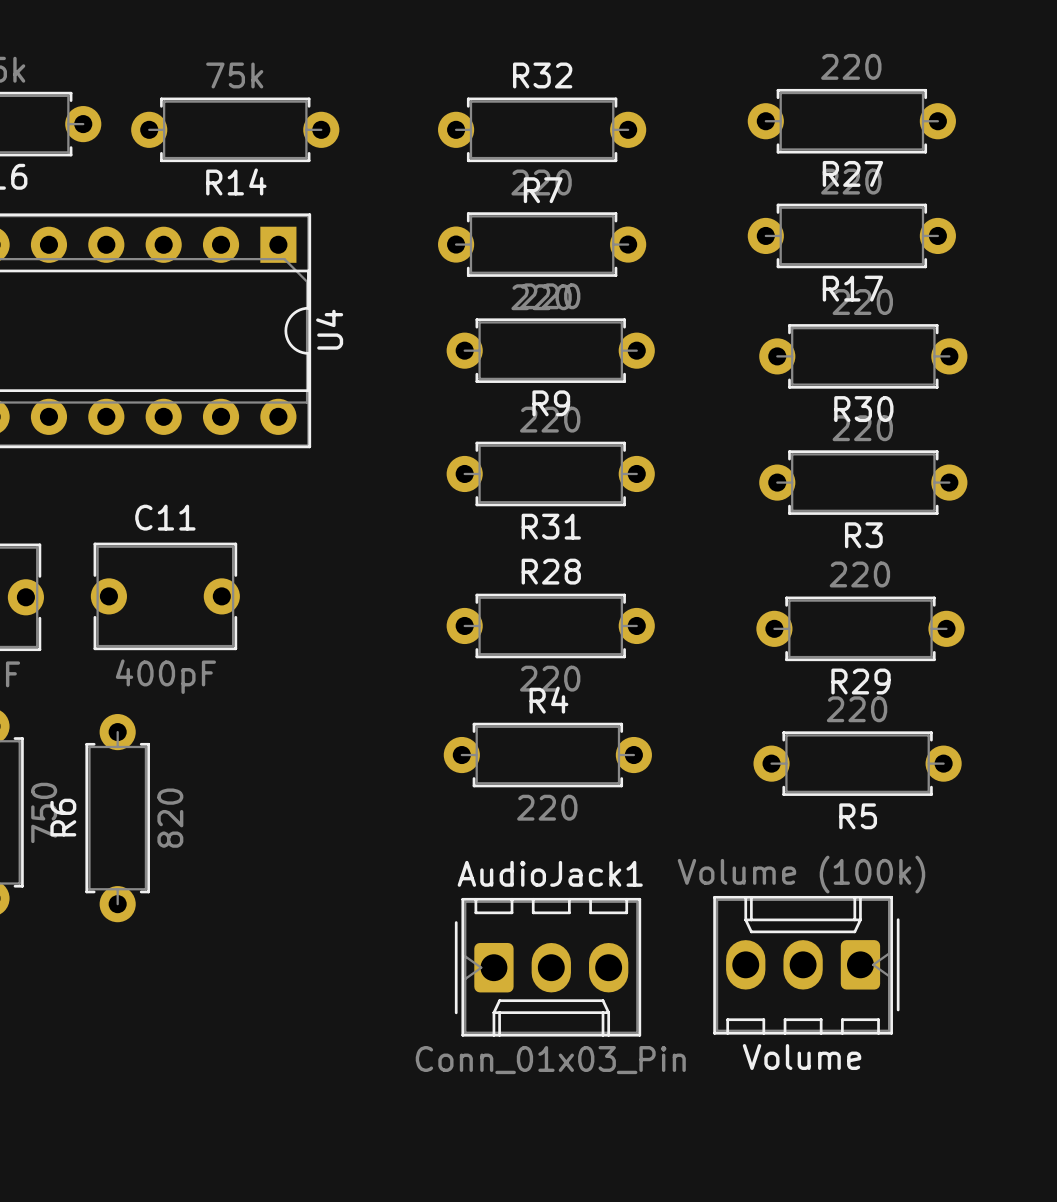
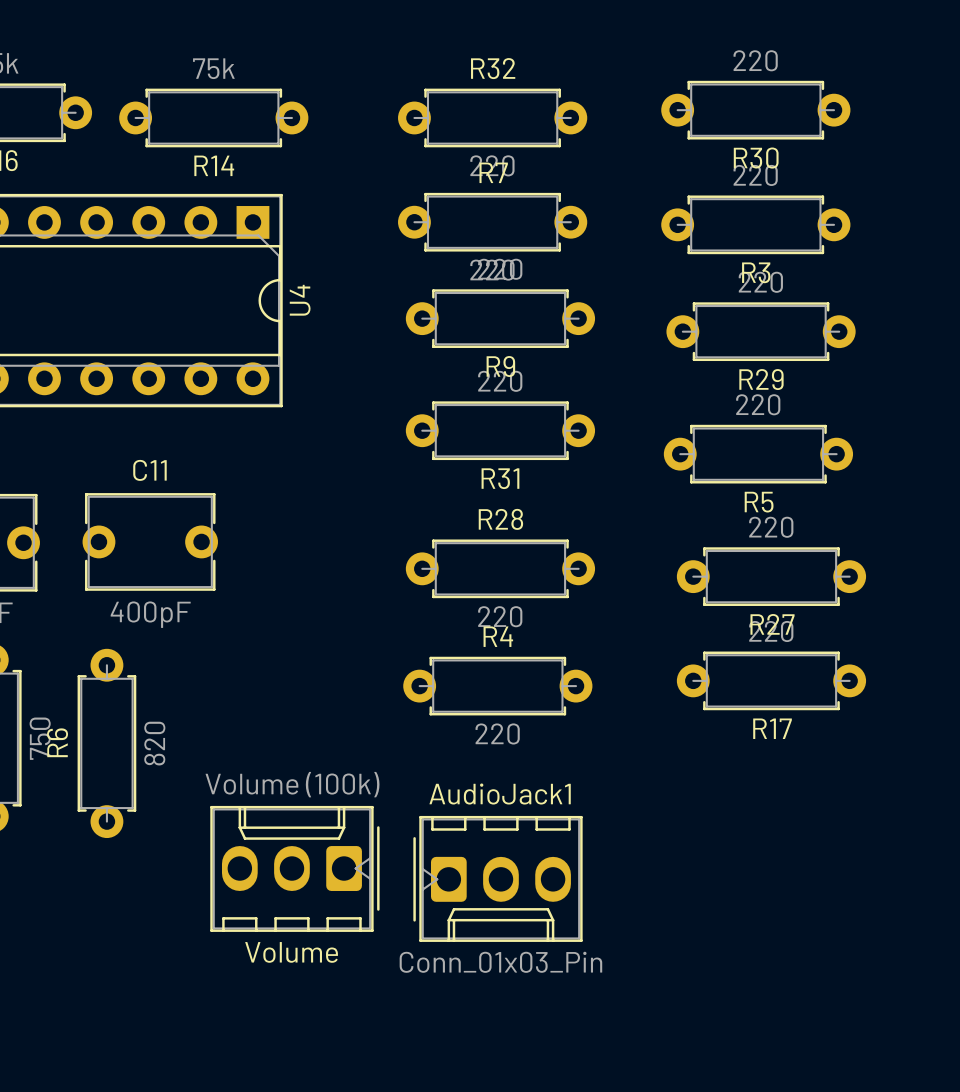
R27 position: (851, 121) -> (771, 576)
R17 position: (851, 235) -> (771, 680)
R30 position: (863, 356) -> (755, 110)
R3 position: (863, 482) -> (755, 224)
R29 position: (860, 628) -> (761, 331)
R5 position: (857, 763) -> (758, 454)
Volume position: (806, 965) -> (294, 868)

